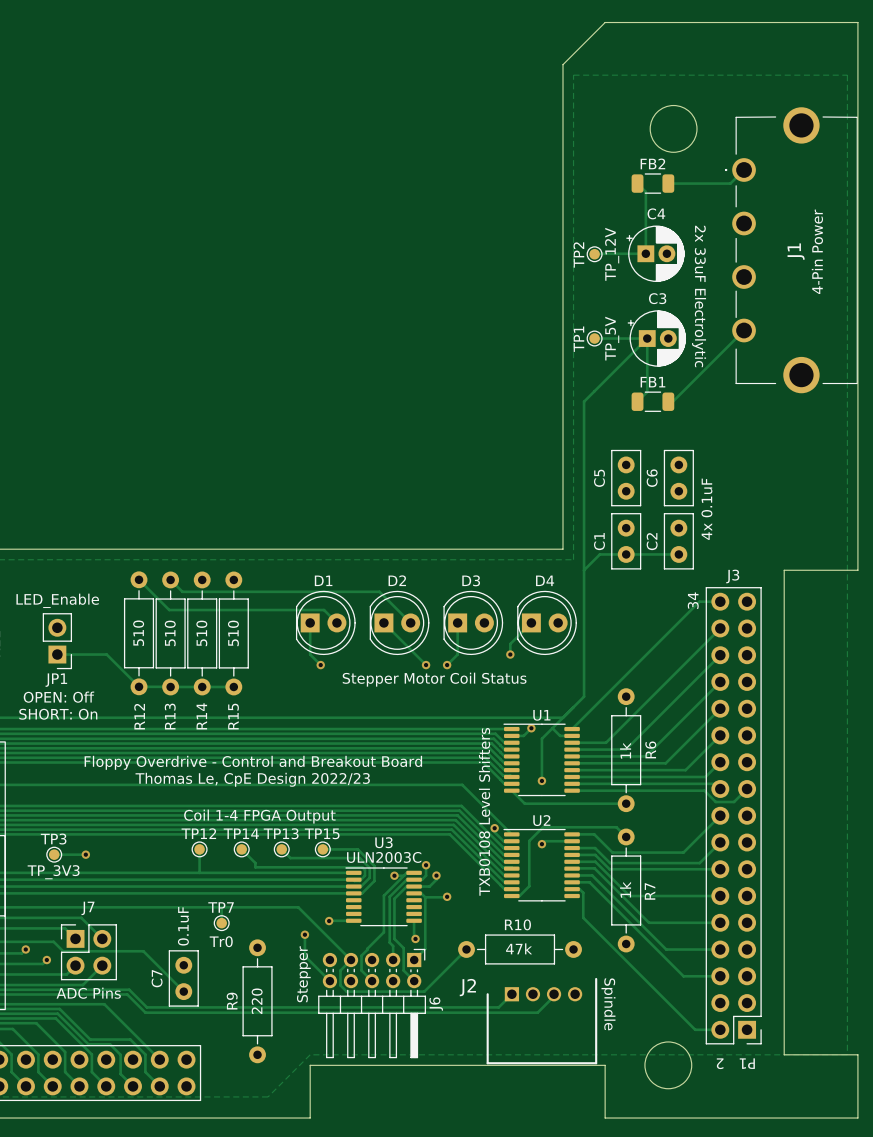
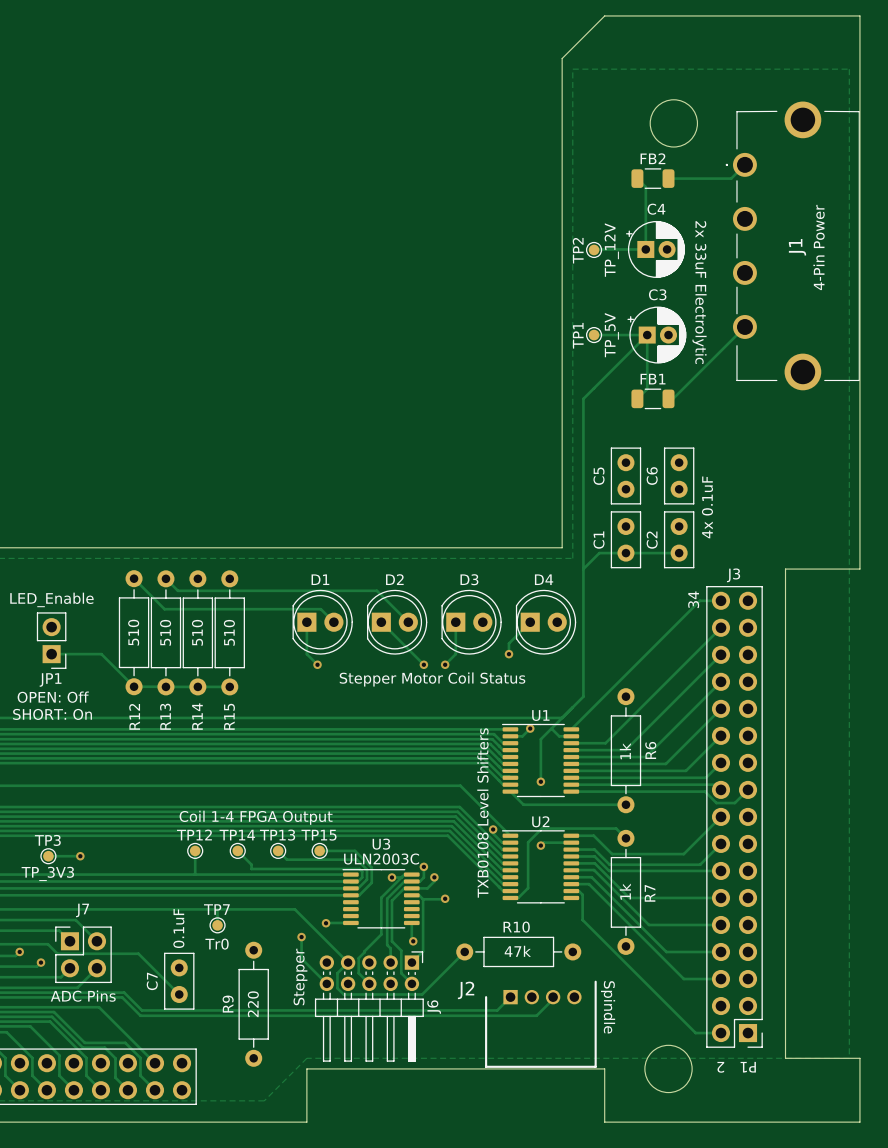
text: Floppy Overdrive - Control and Breakout Board (253, 762) -> none
text: Thomas Le, CpE Design 2022/23 (252, 779) -> none

